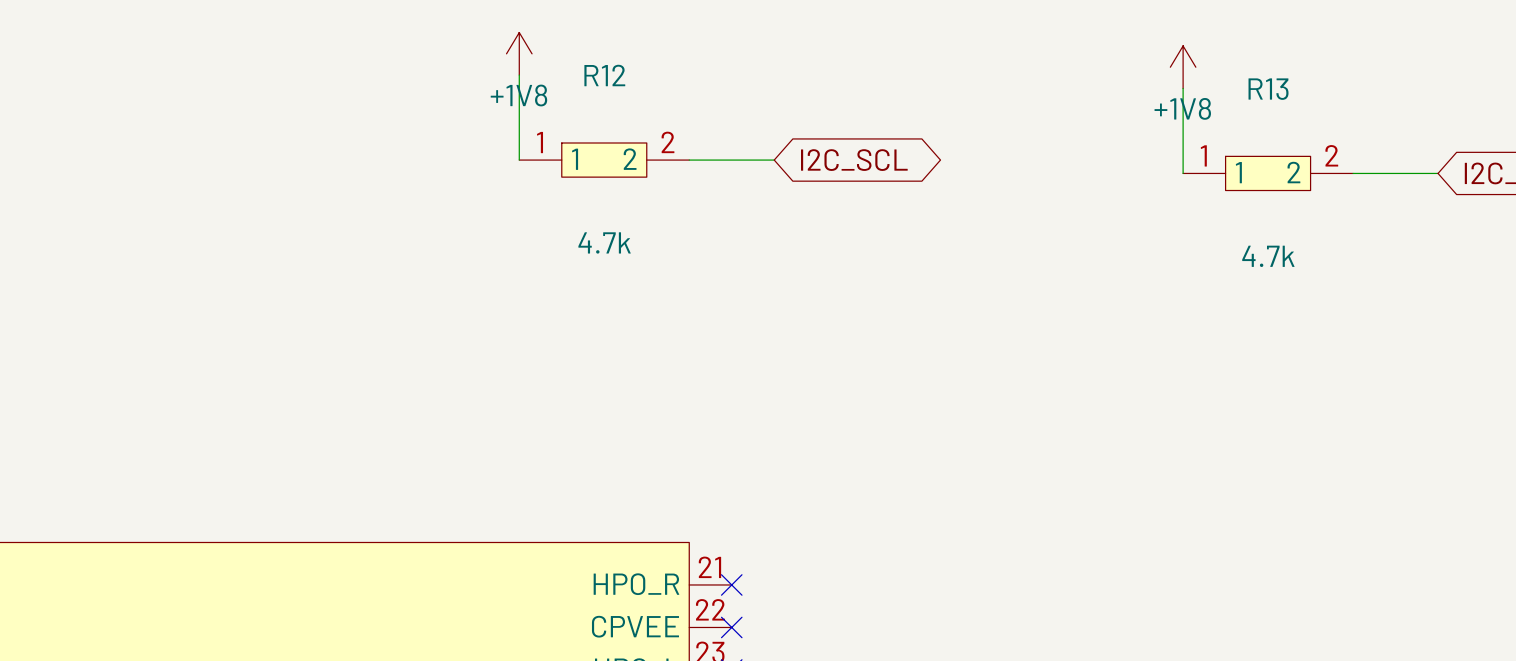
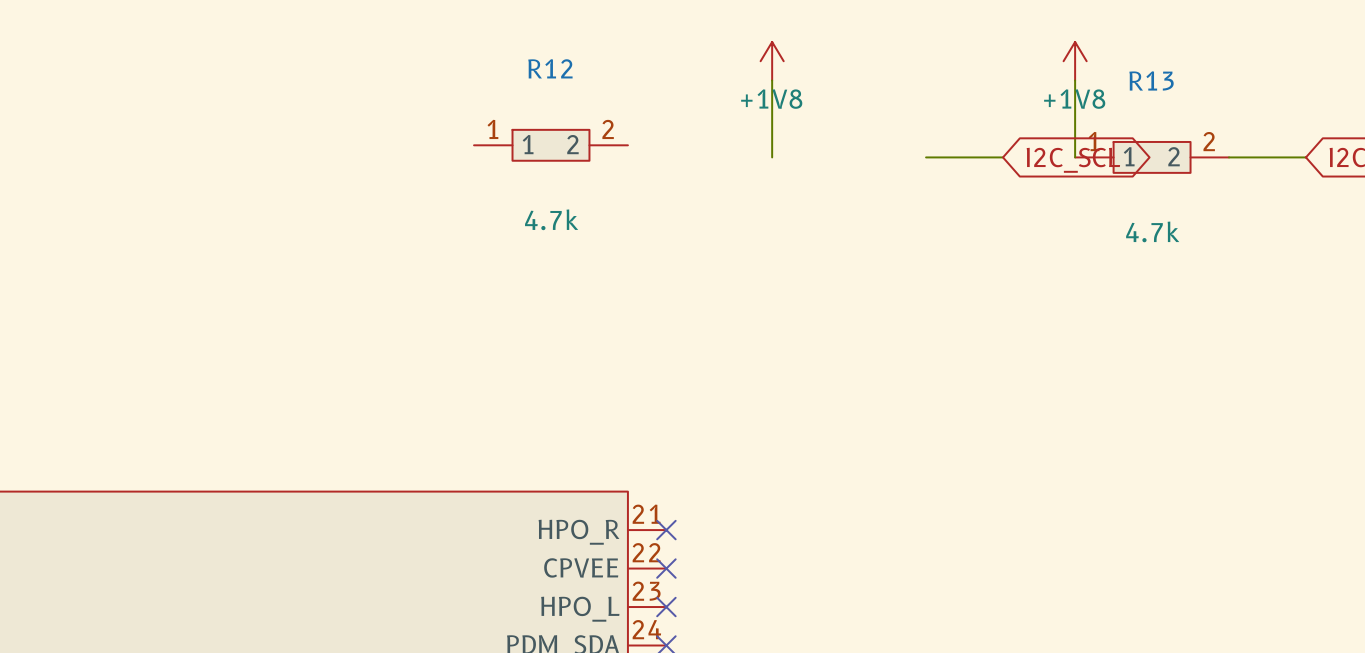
power symbol position: +1V8 (519, 53) -> +1V8 (772, 61)
wire: (519, 75) (519, 160) -> (772, 80) (772, 157)
wire: (689, 160) (774, 160) -> (926, 157) (1003, 157)
global label position: I2C_SCL (854, 160) -> I2C_SCL (1073, 160)

